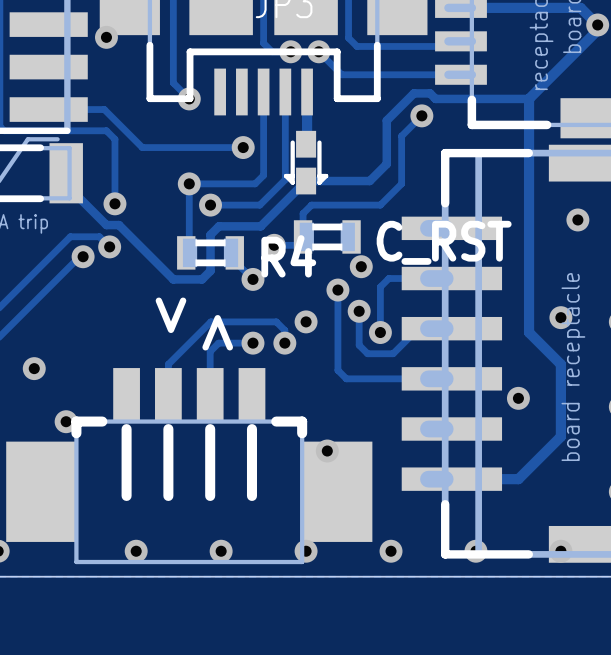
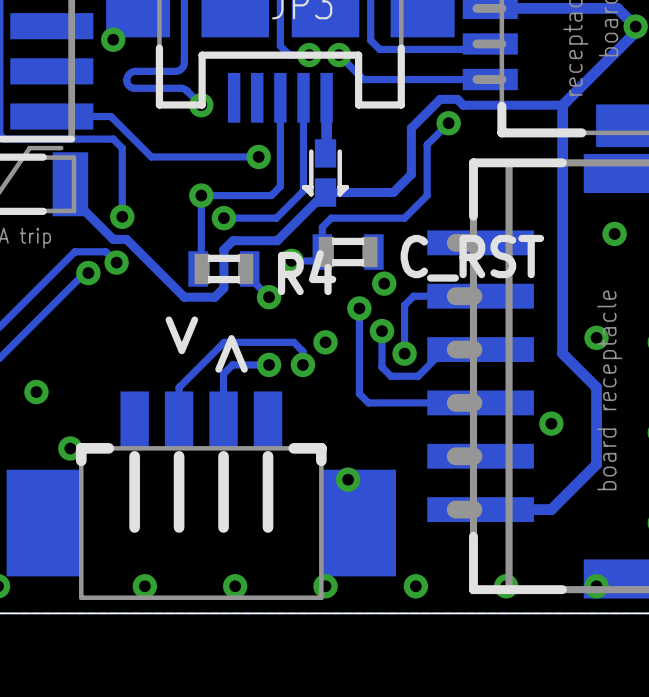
track: (173, 58) (173, 83) (175, 85) -> (184, 62) (182, 67) (176, 71) (133, 71) (128, 74) (126, 81) (129, 85) (133, 88) (180, 88) (187, 90)

